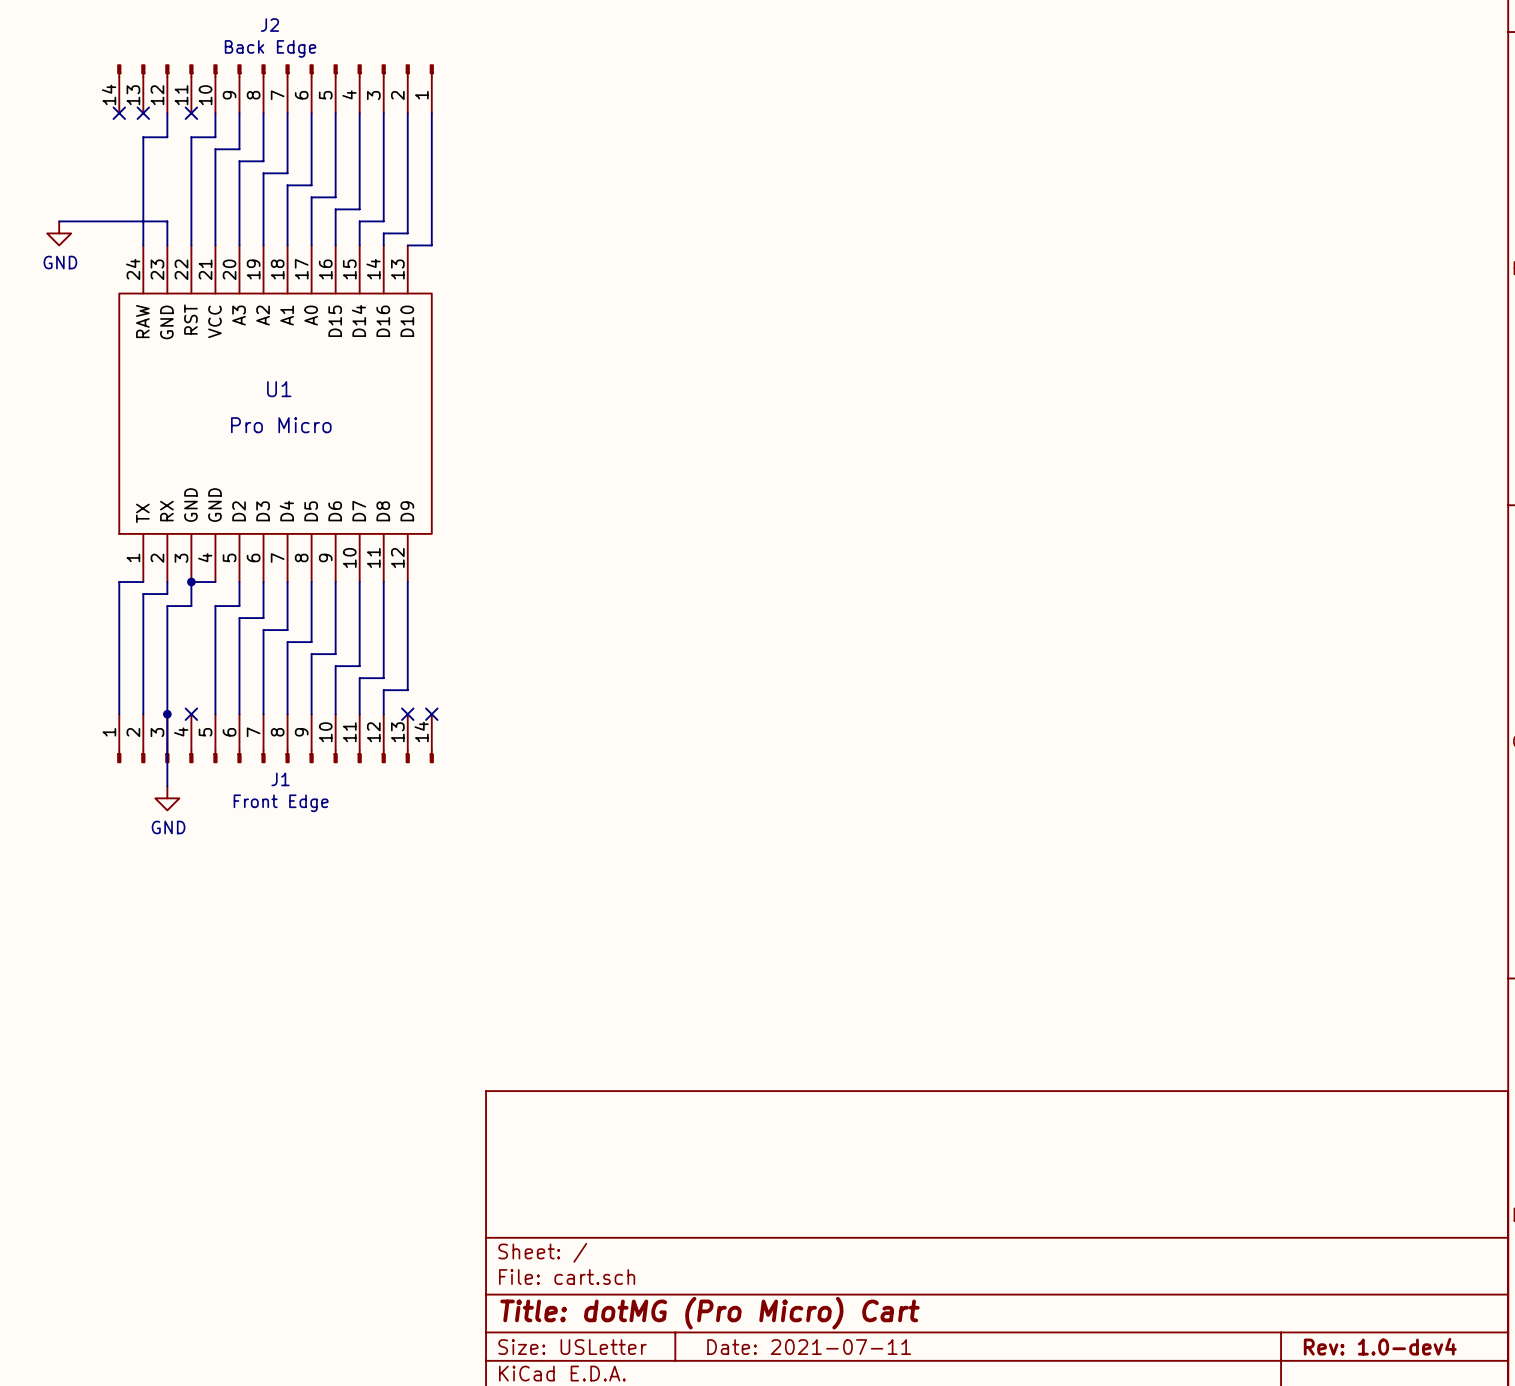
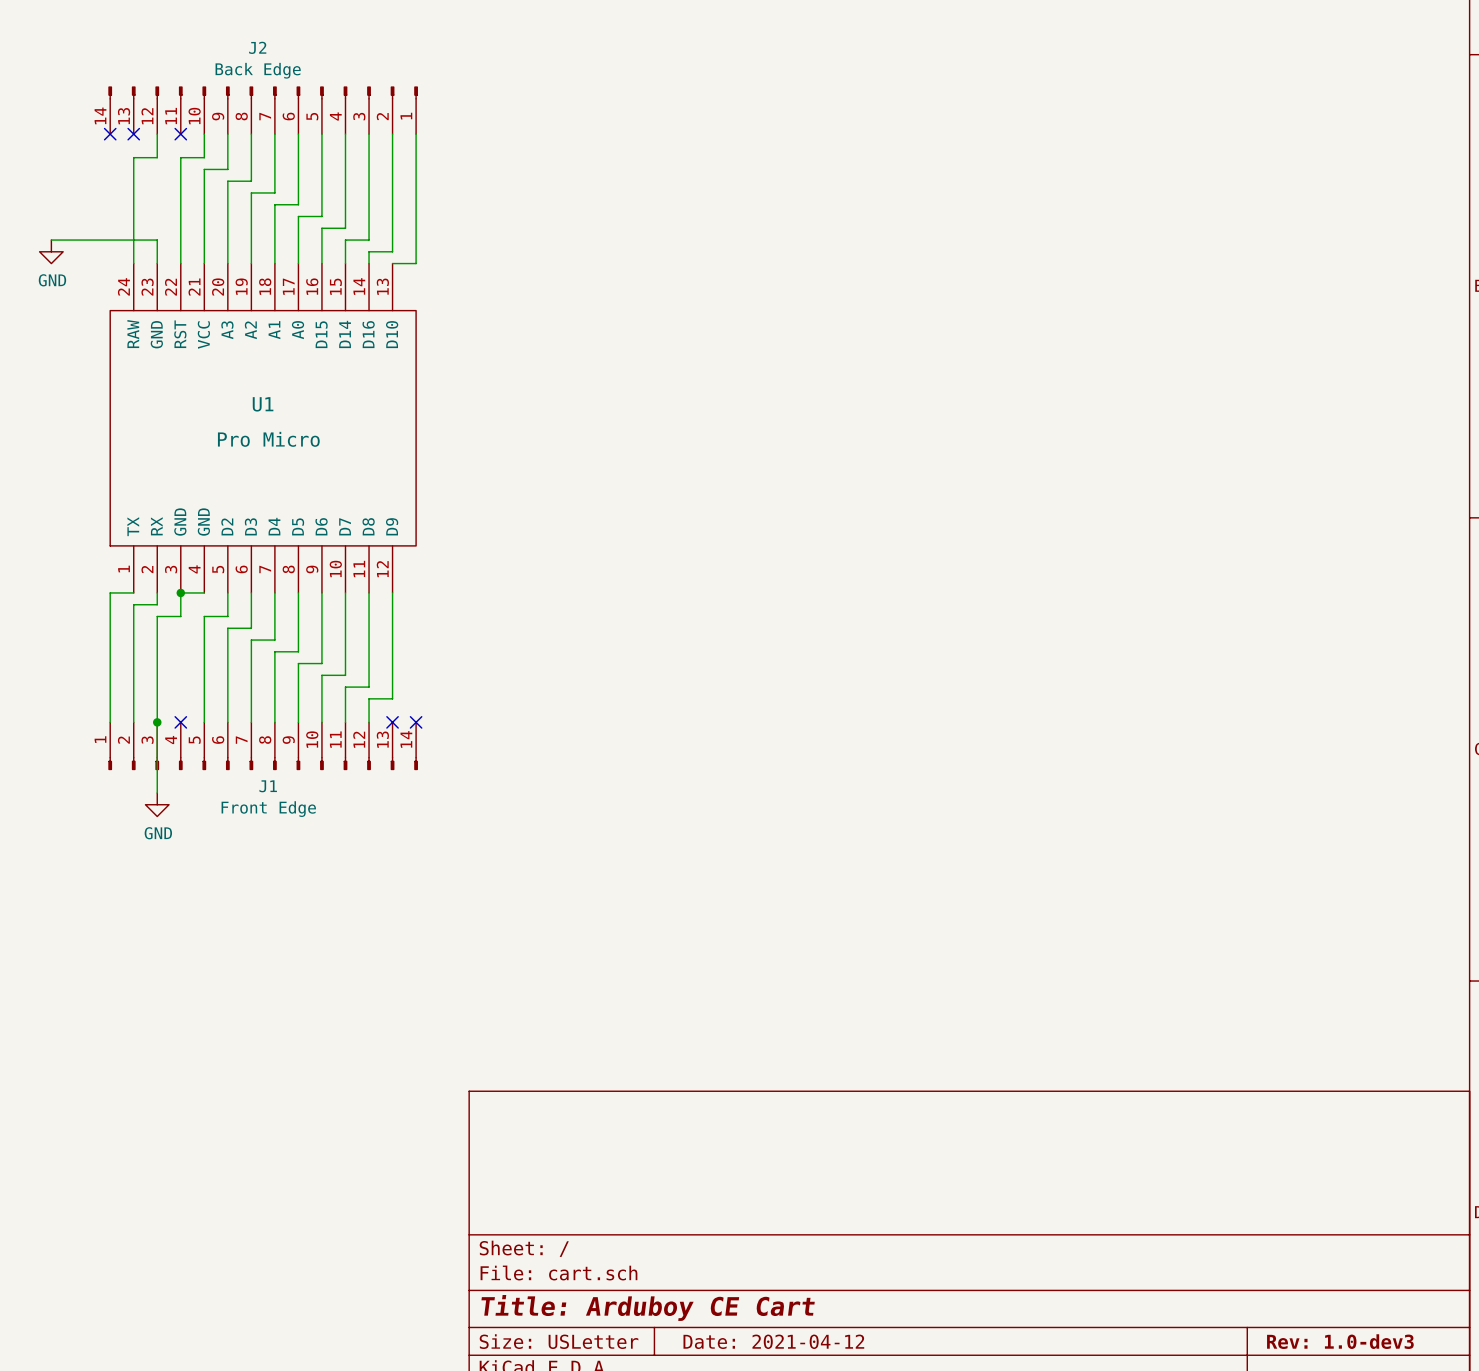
title block: Title: dotMG (Pro Micro) Cart (709, 1313) -> Title: Arduboy CE Cart (648, 1307)
title block: Rev: 1.0-dev4 (1380, 1346) -> Rev: 1.0-dev3 (1340, 1341)
title block: Date: 2021-07-11 (809, 1347) -> Date: 2021-04-12 (773, 1341)

